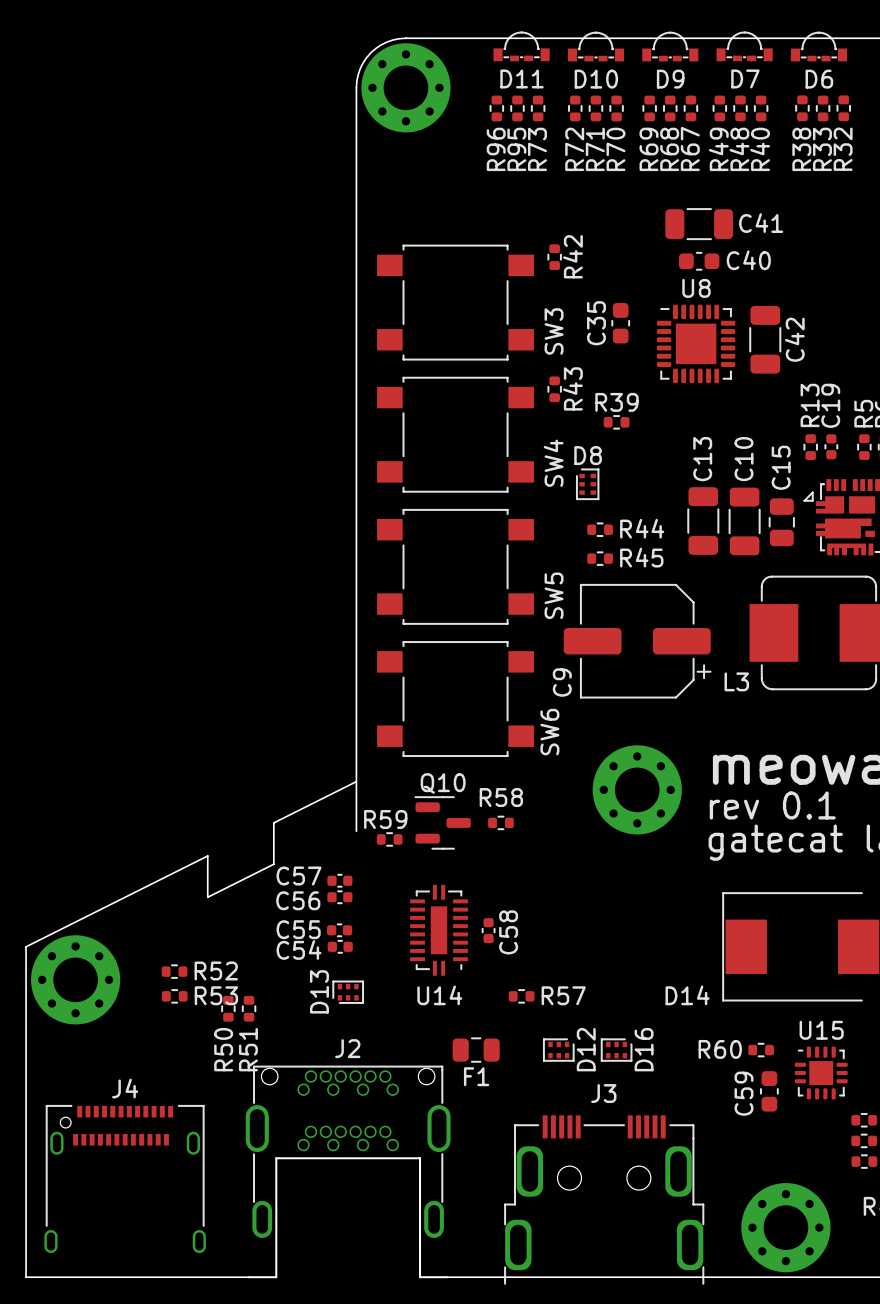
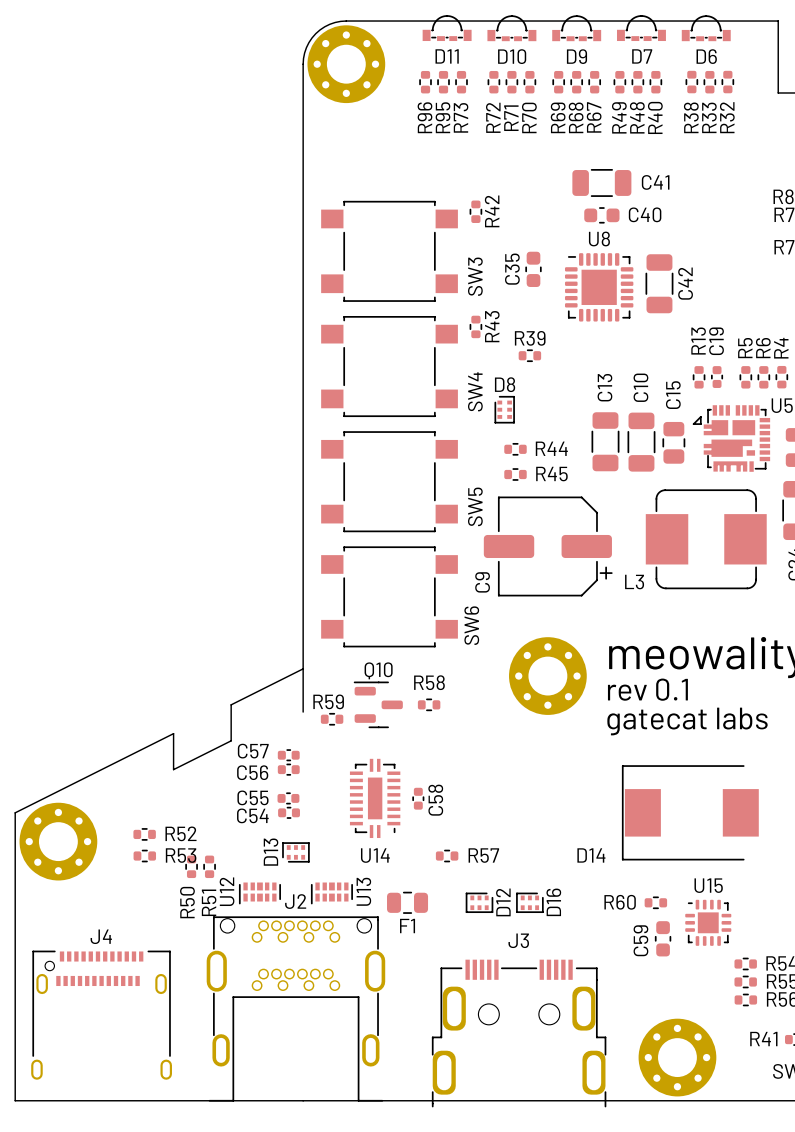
U12: none -> (259, 893)
U13: none -> (331, 893)
board edge: none -> (209, 1100) (382, 1100)

